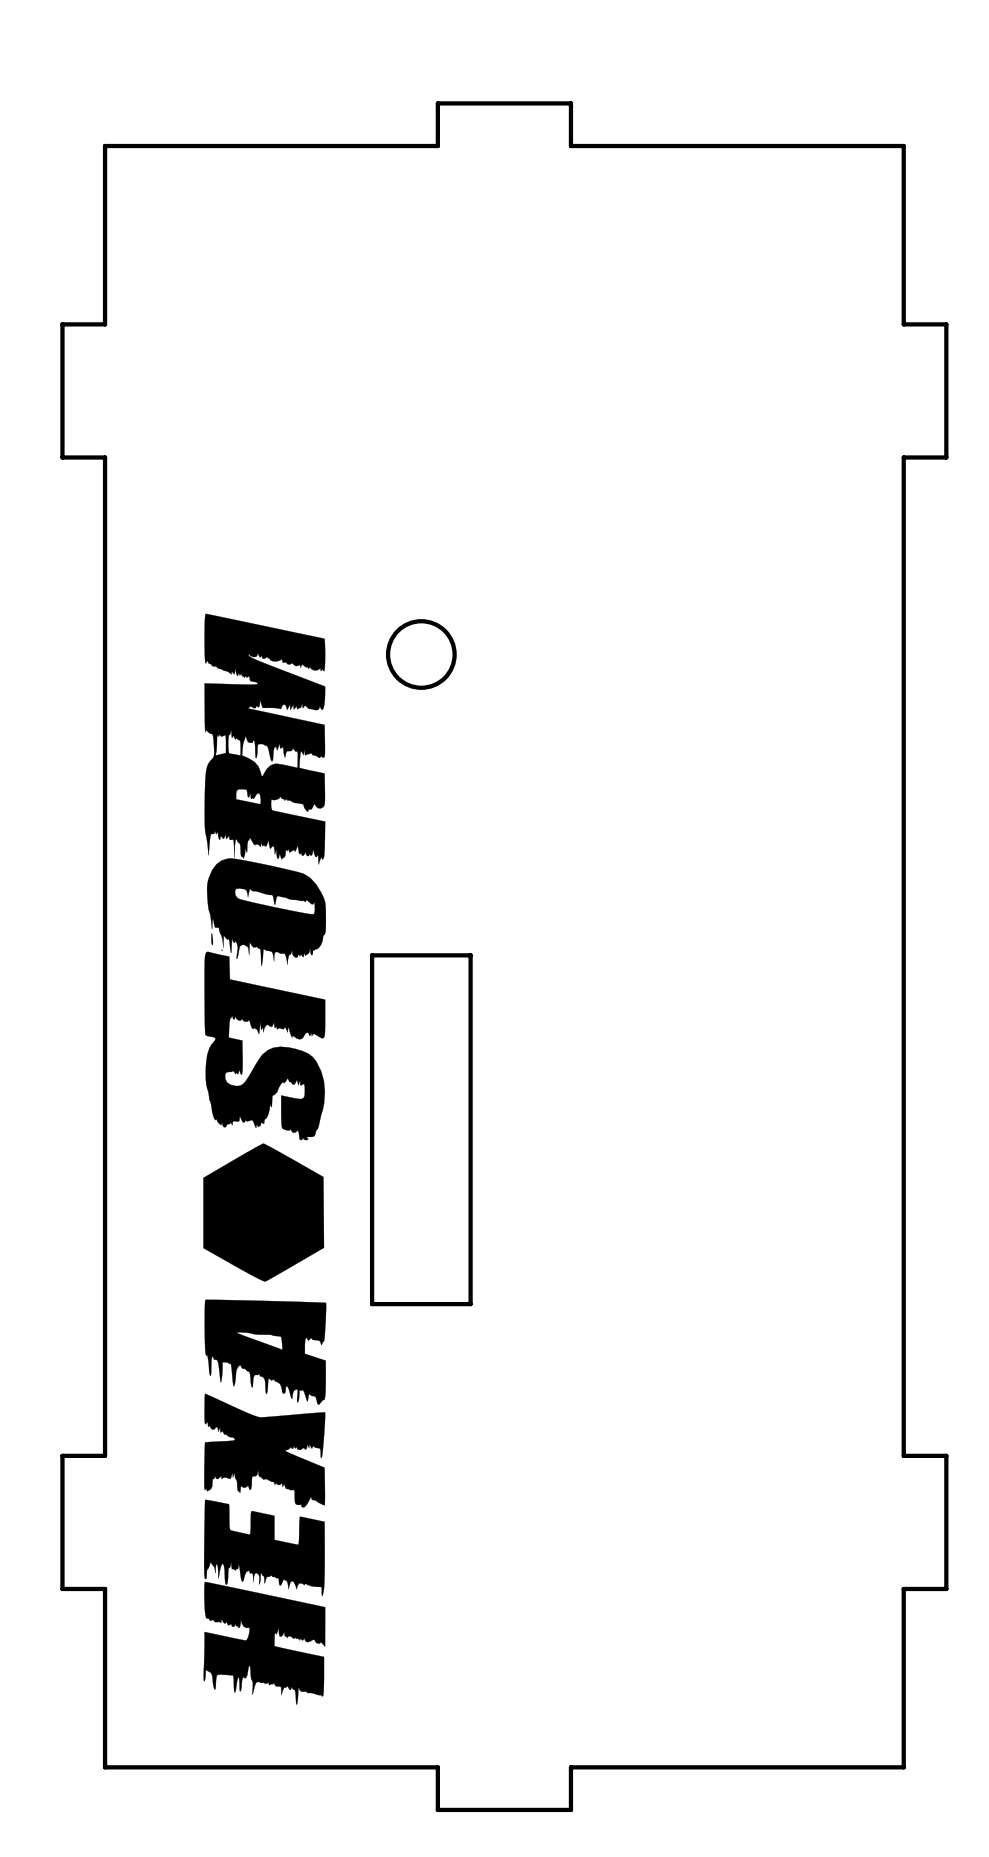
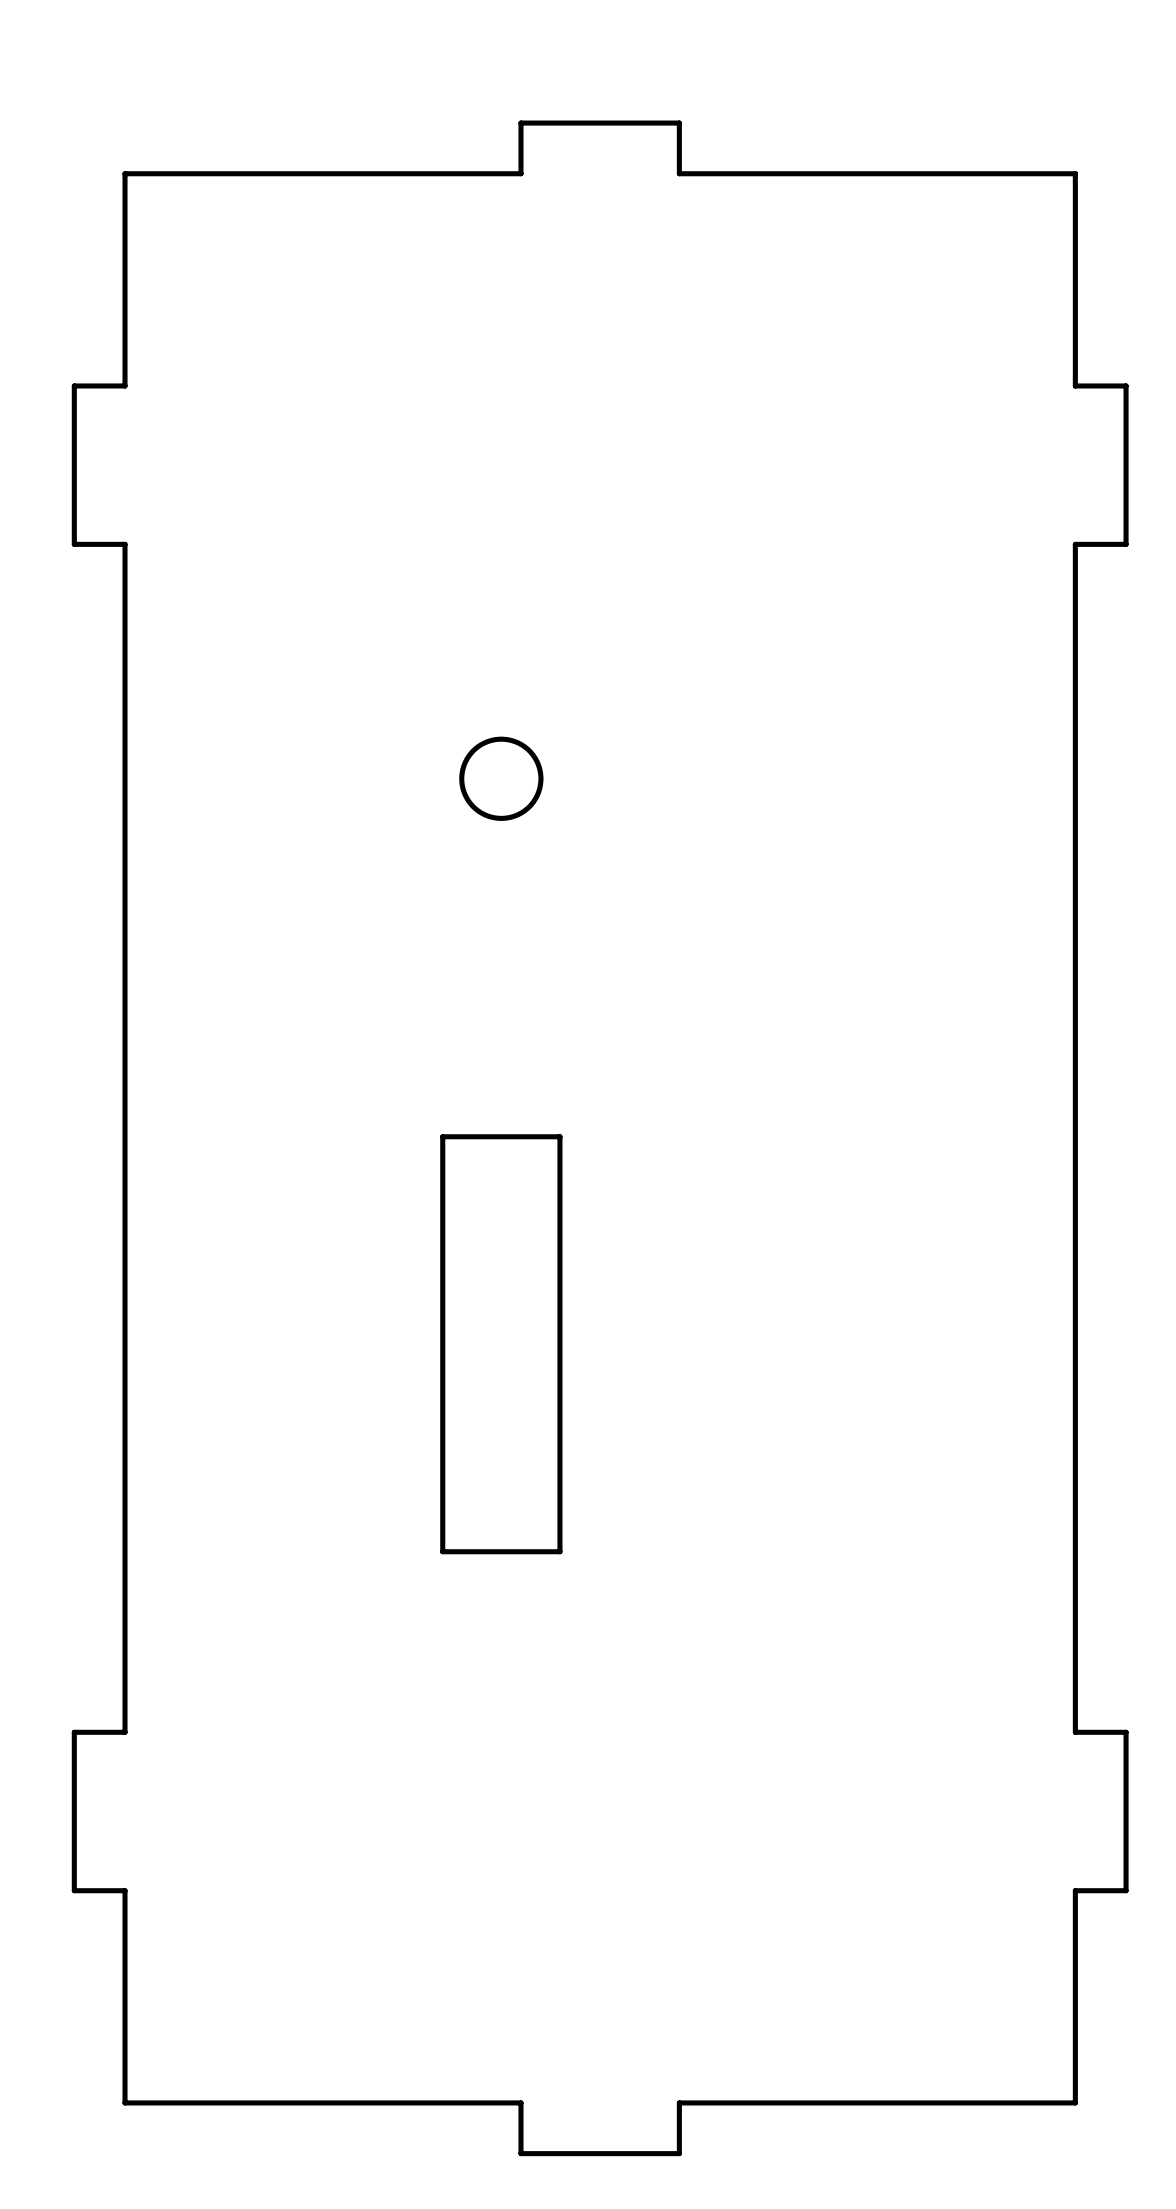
drawing: [203, 613, 327, 1705] -> none

